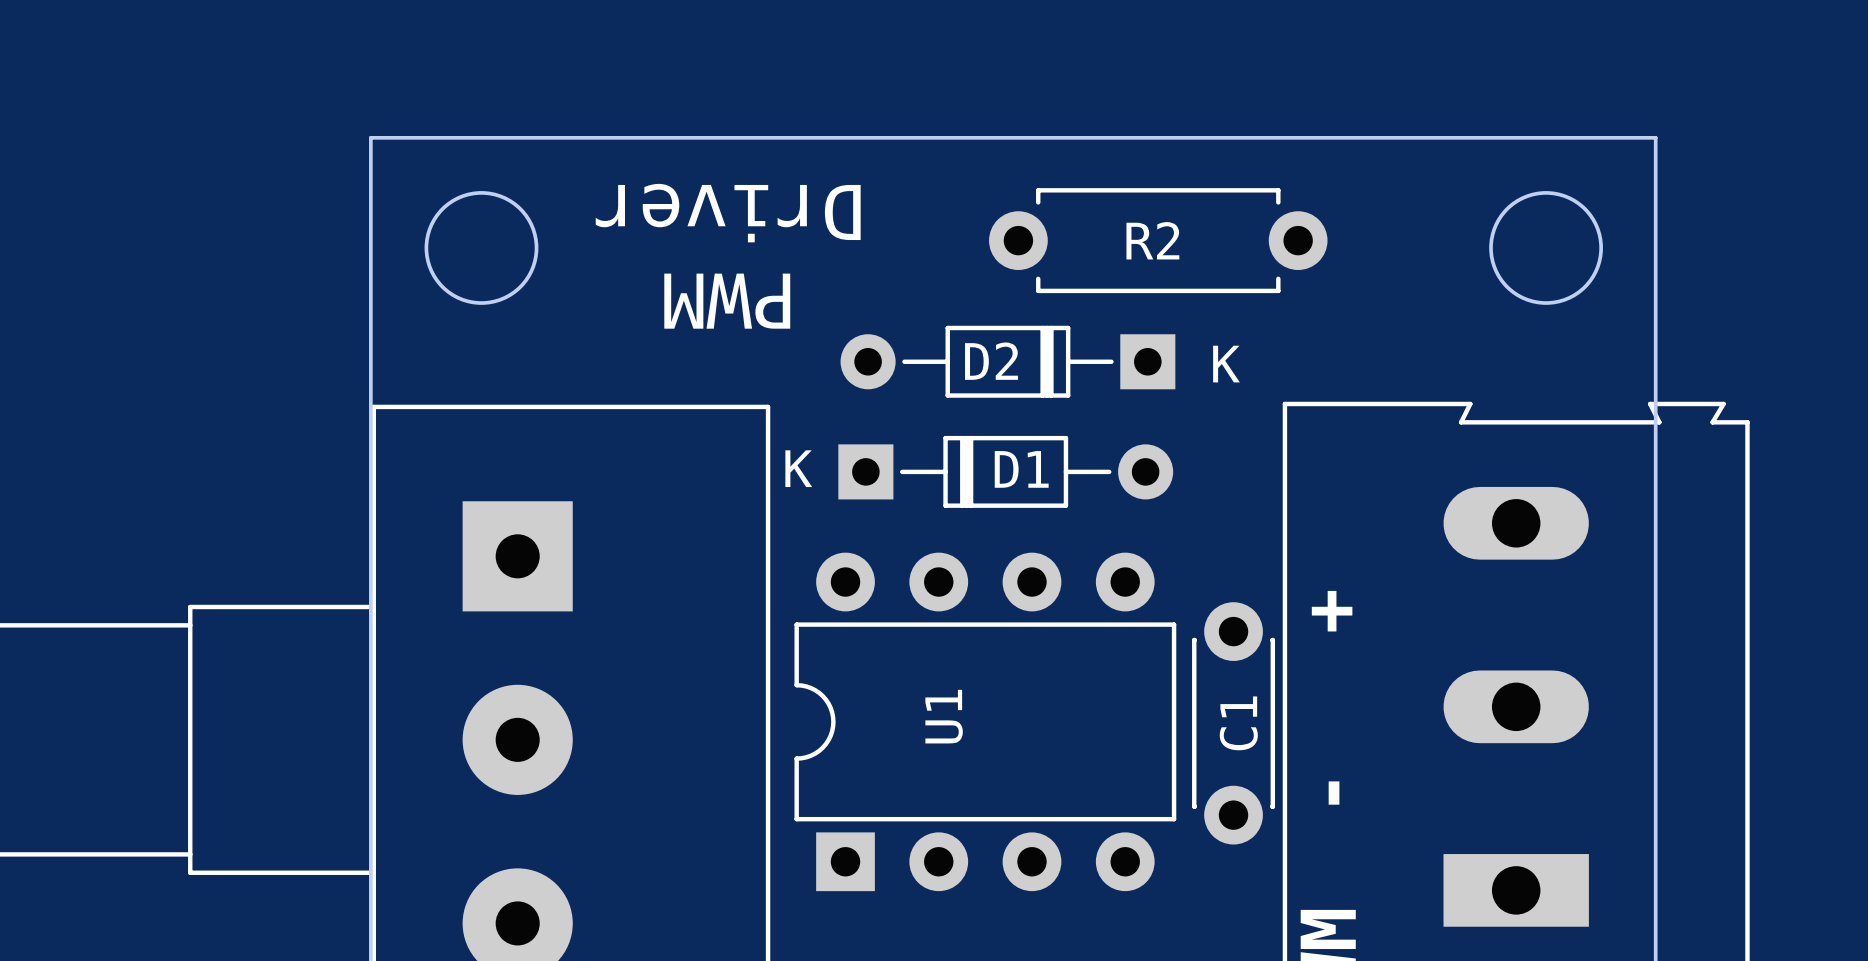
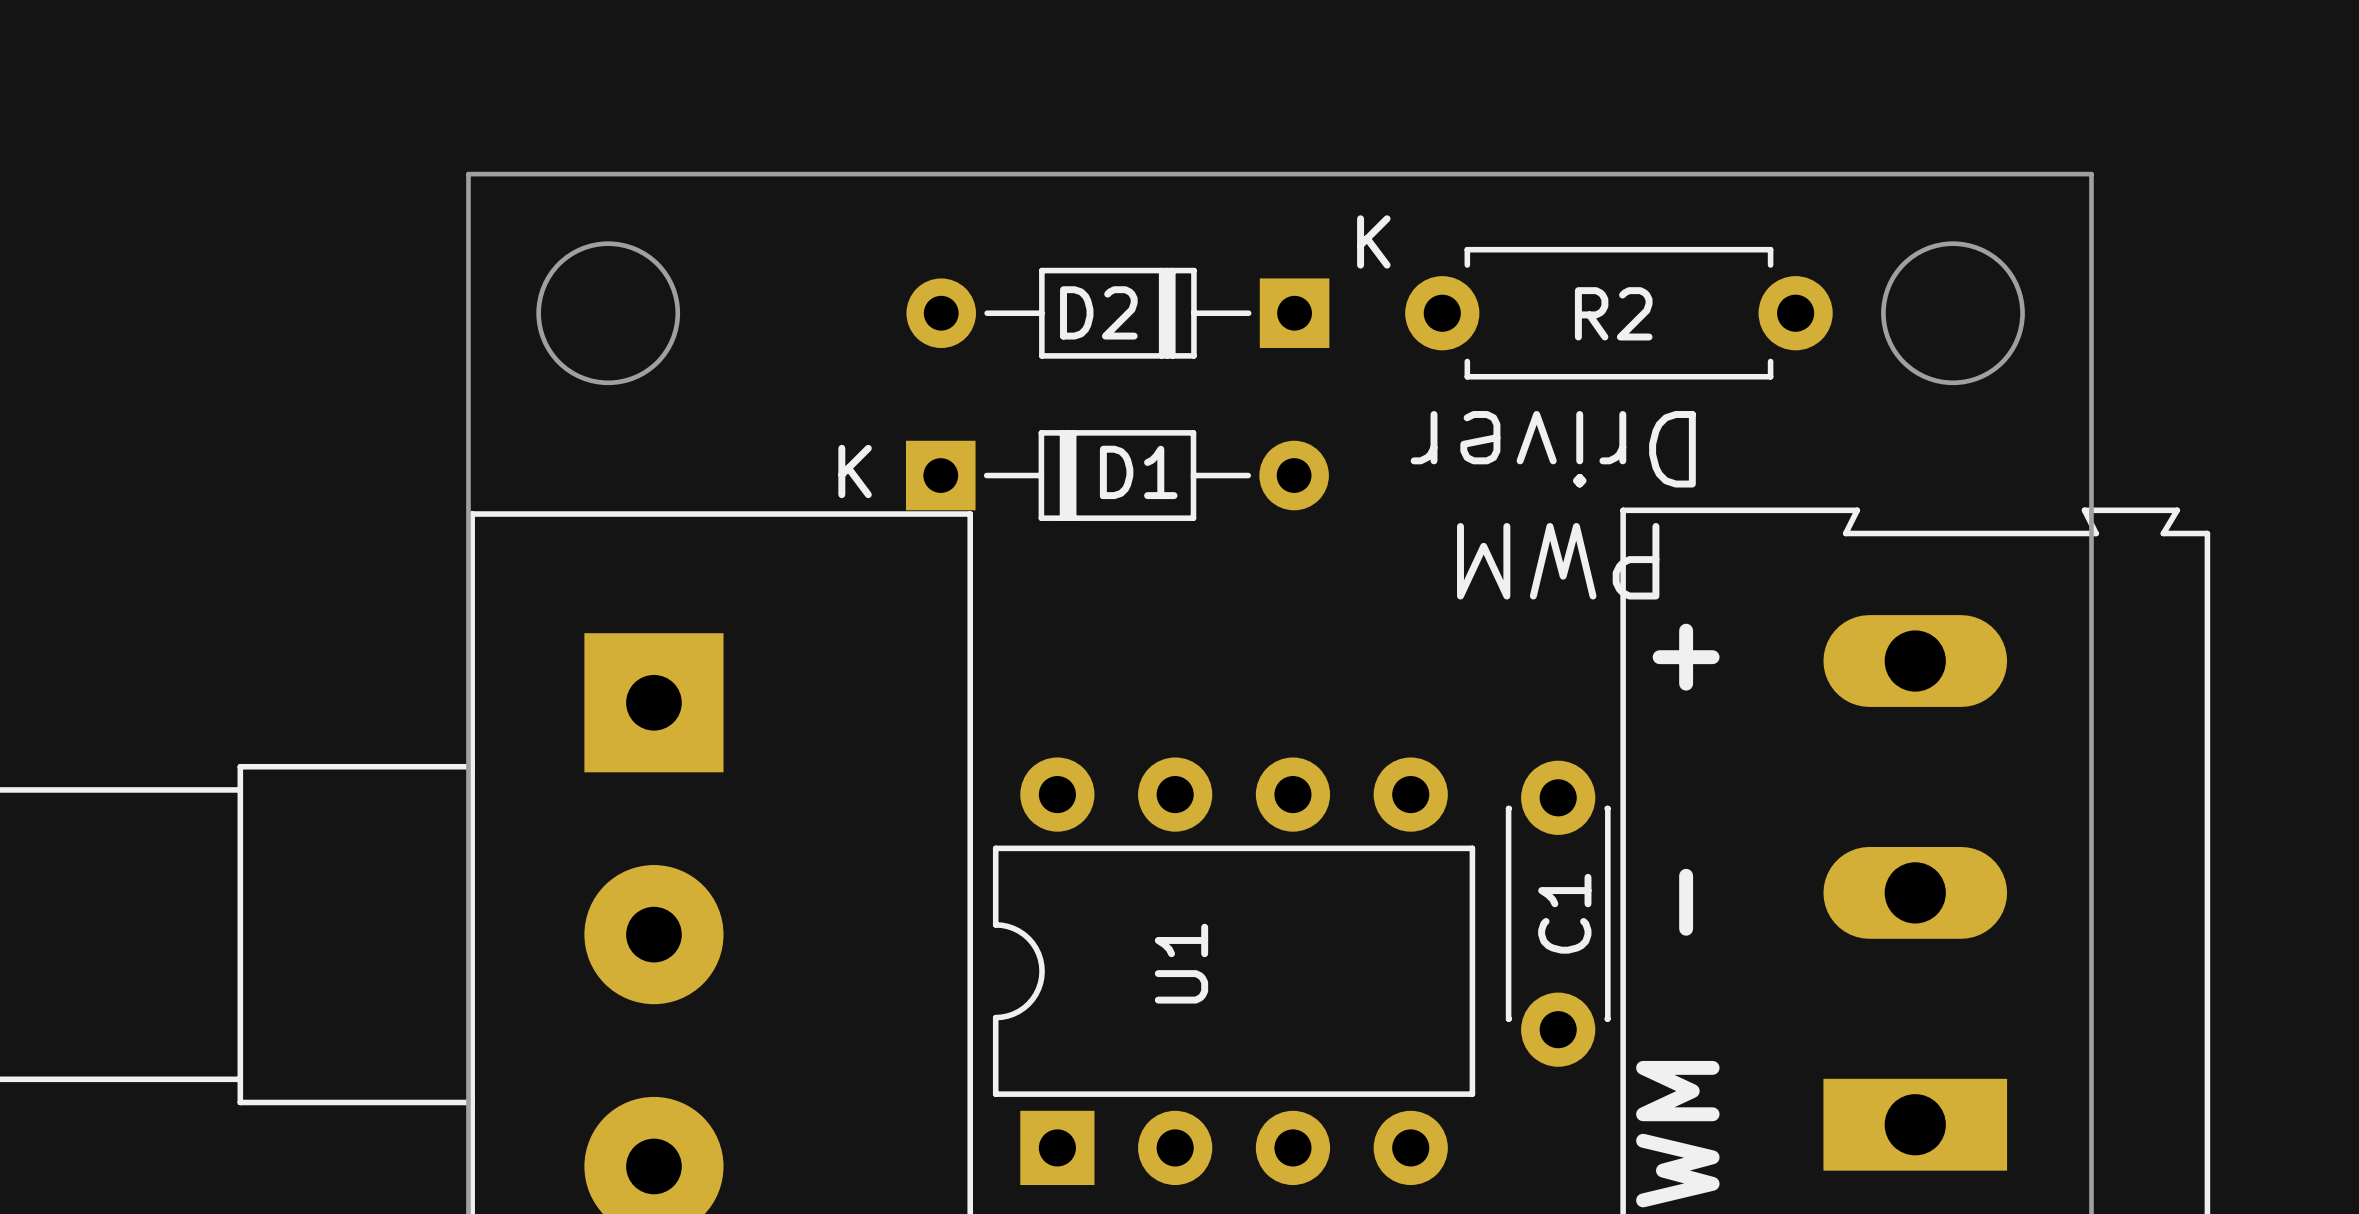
text position: Driver (728, 213) -> Driver (1553, 449)
R2 position: (1158, 240) -> (1618, 313)
text position: PWM (727, 301) -> PWM (1558, 561)
D2 position: (1007, 361) -> (1117, 313)
D2 text position: K (1226, 364) -> K (1373, 241)
D1 position: (1005, 471) -> (1117, 475)
U1 position: (985, 721) -> (1234, 971)

